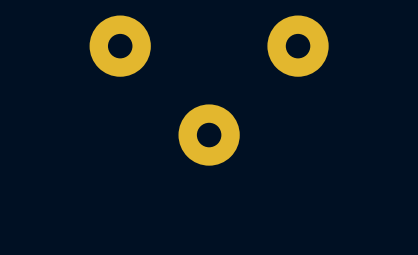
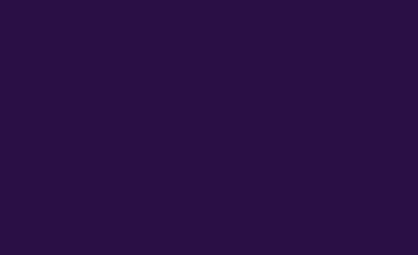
part: (209, 90) -> none

